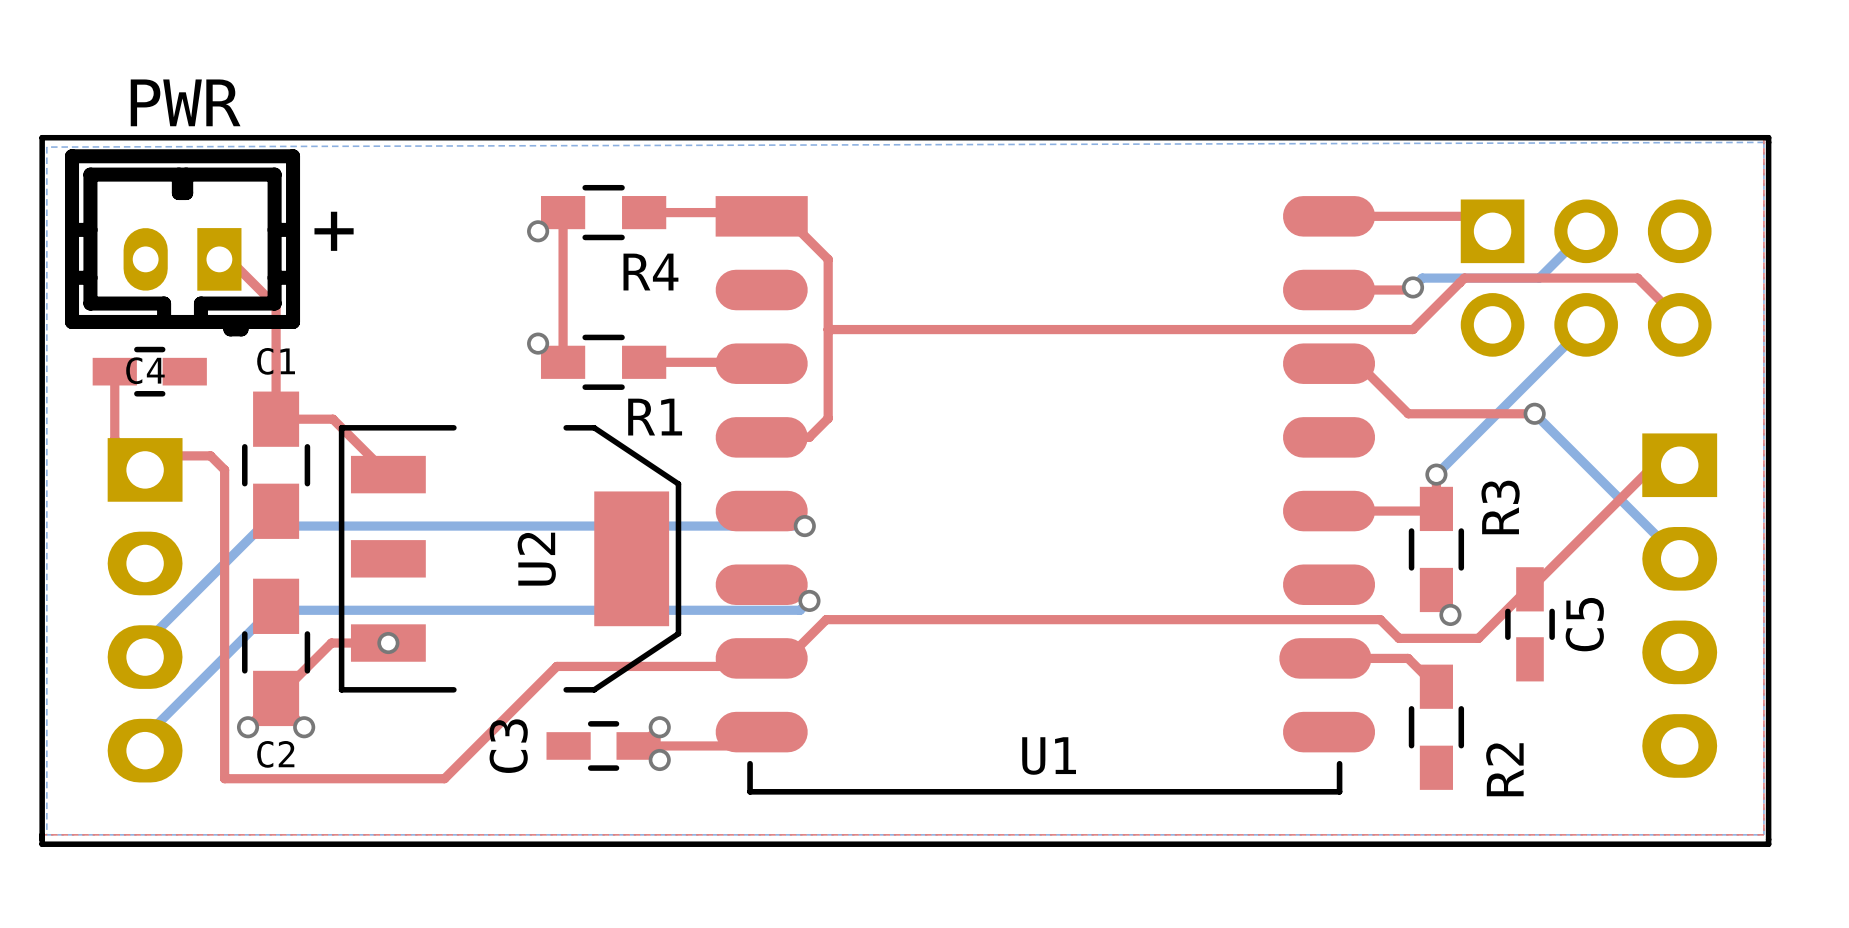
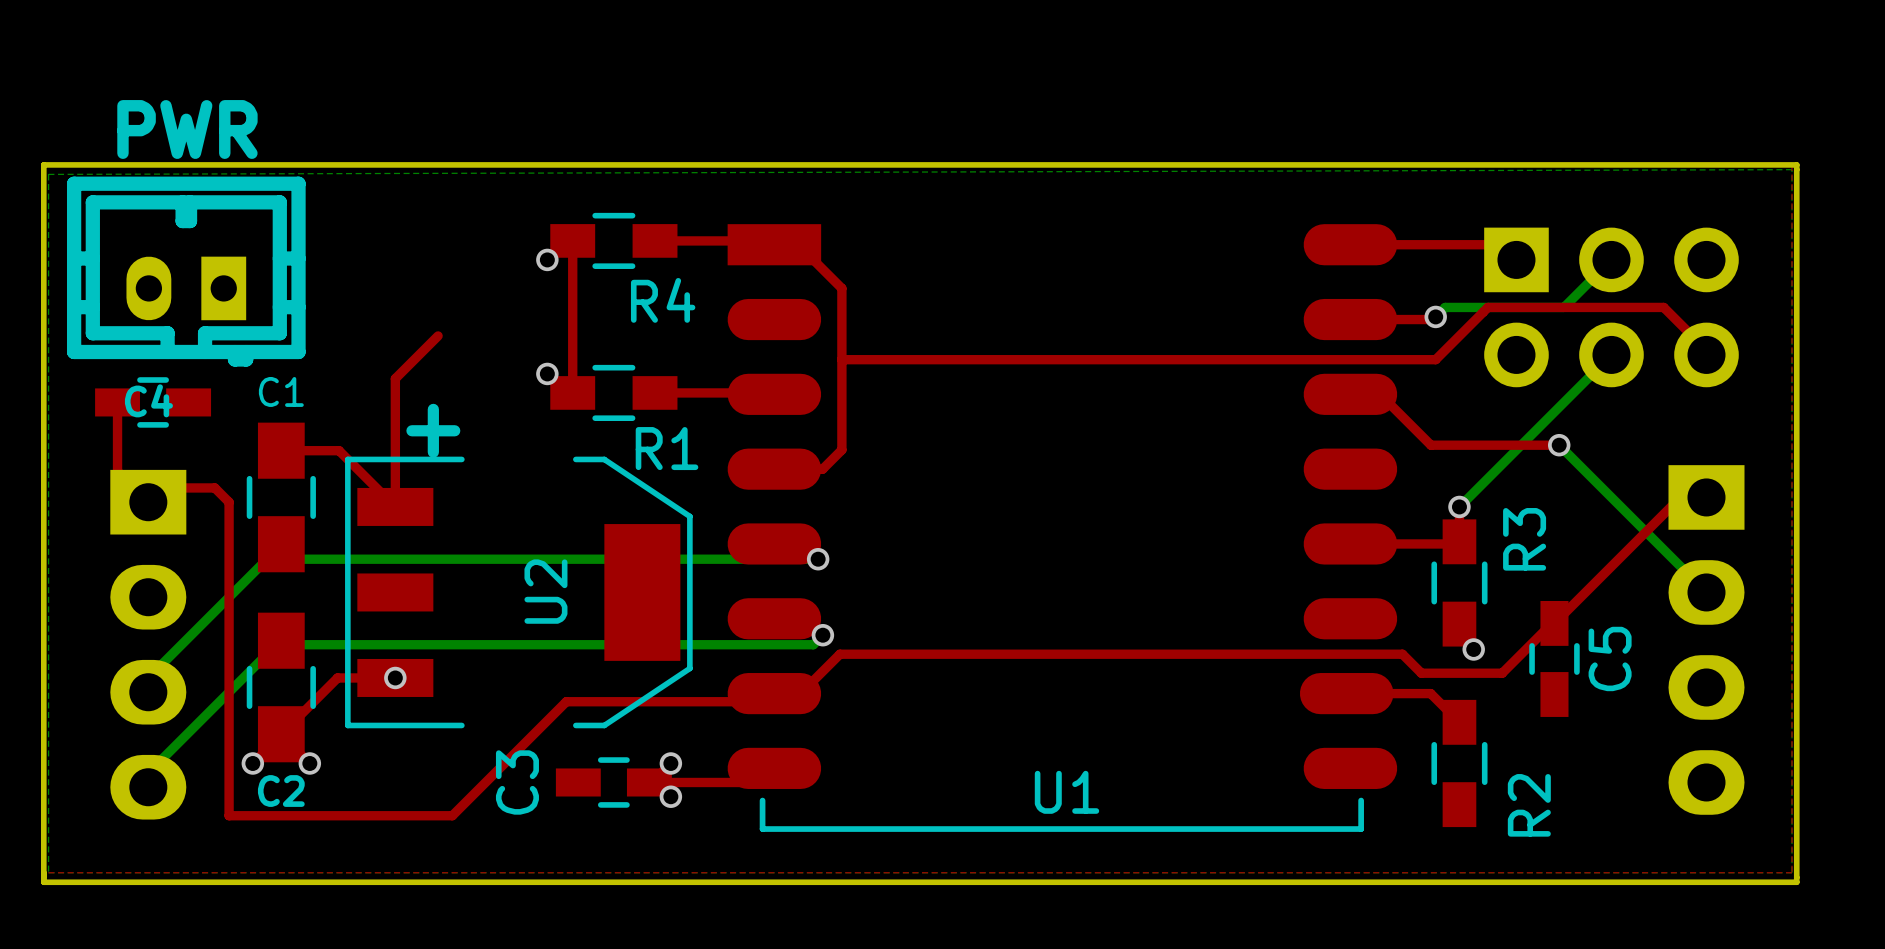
text rotation: 0° (334, 231) -> 90° clockwise (433, 430)
text position: + (334, 231) -> + (433, 430)
top track: (219, 259) (229, 259) (276, 306) (276, 419) -> none
top track: none -> (438, 335) (395, 378) (395, 506)

